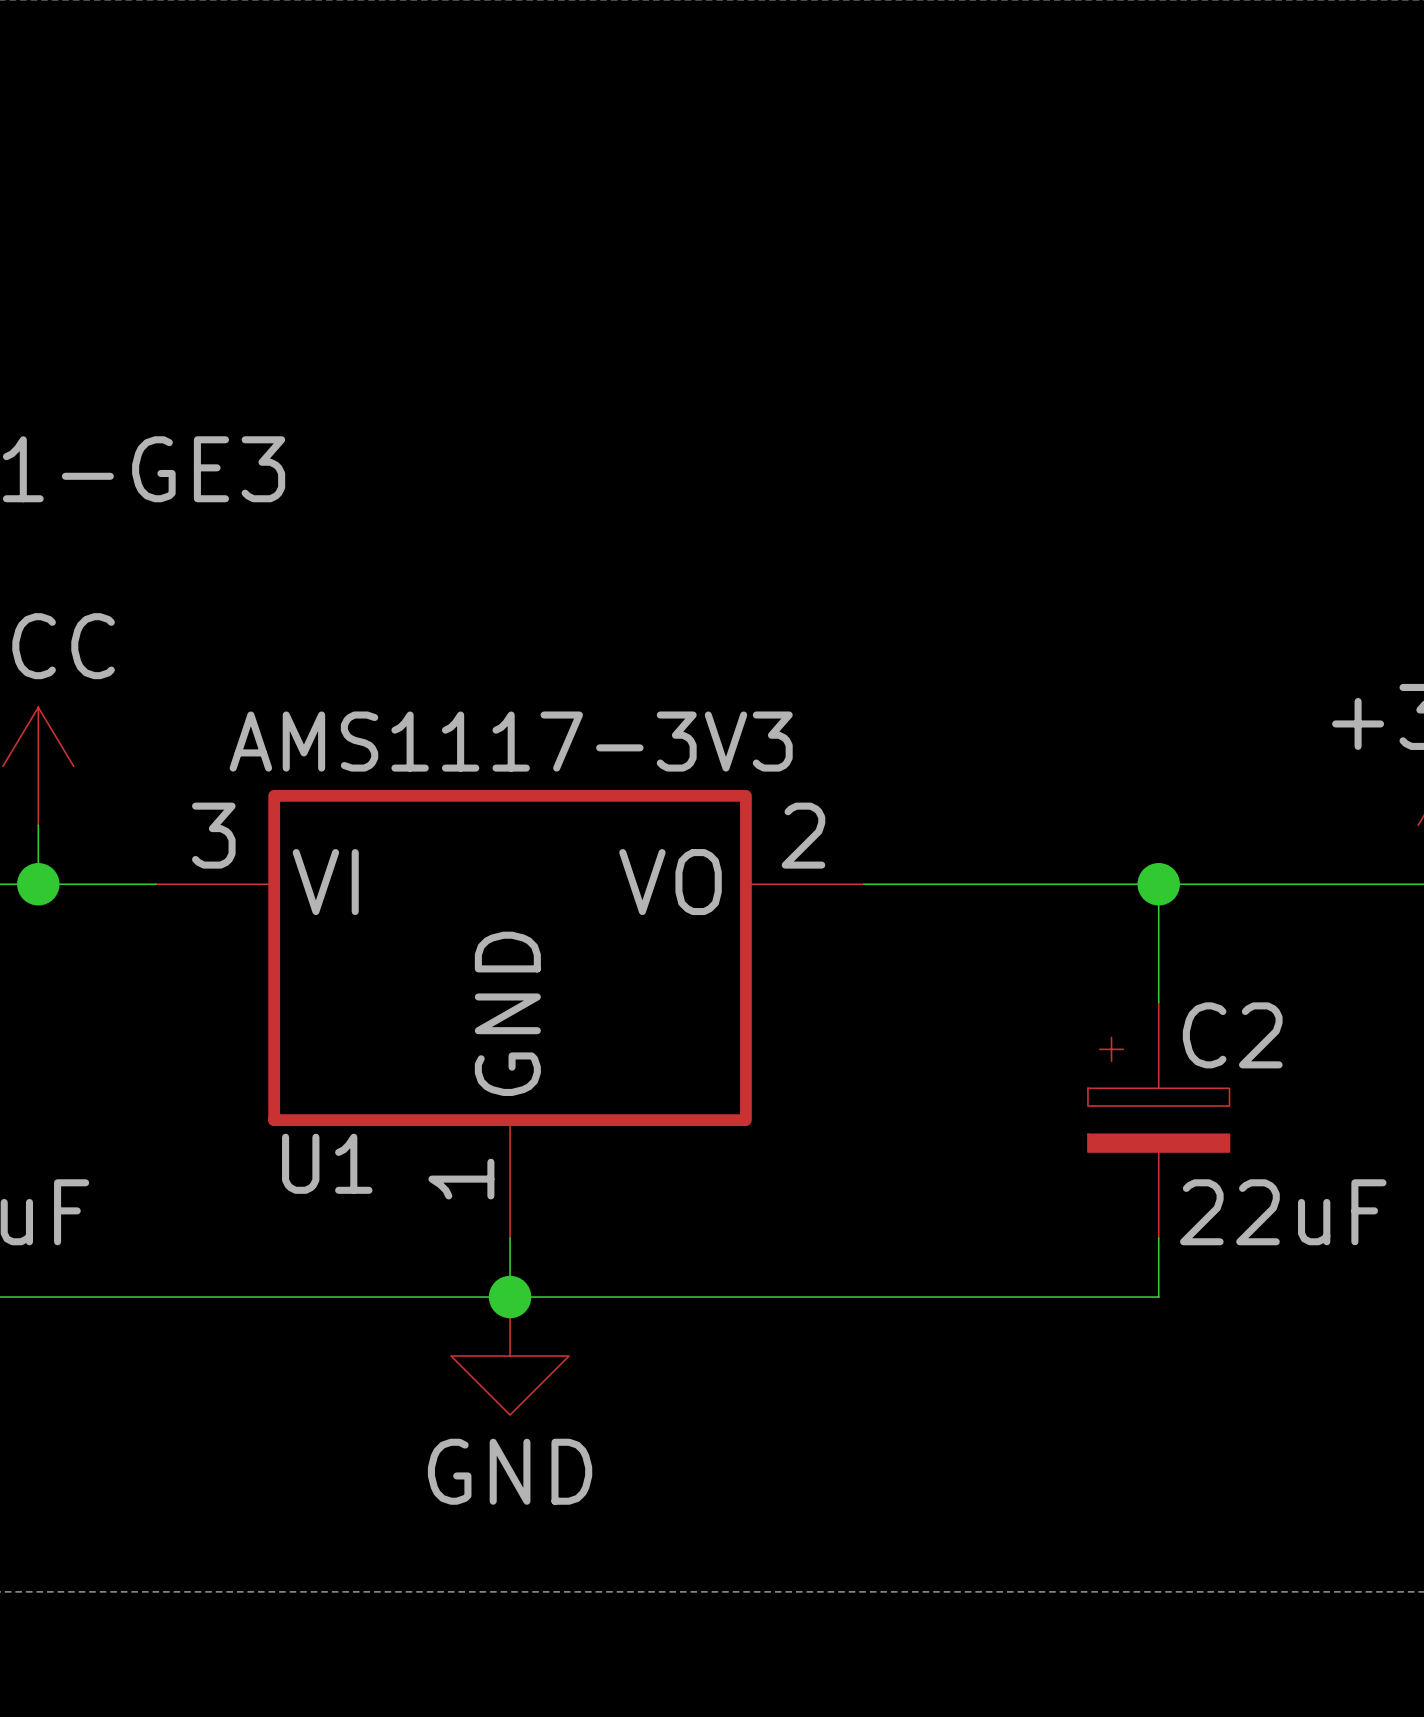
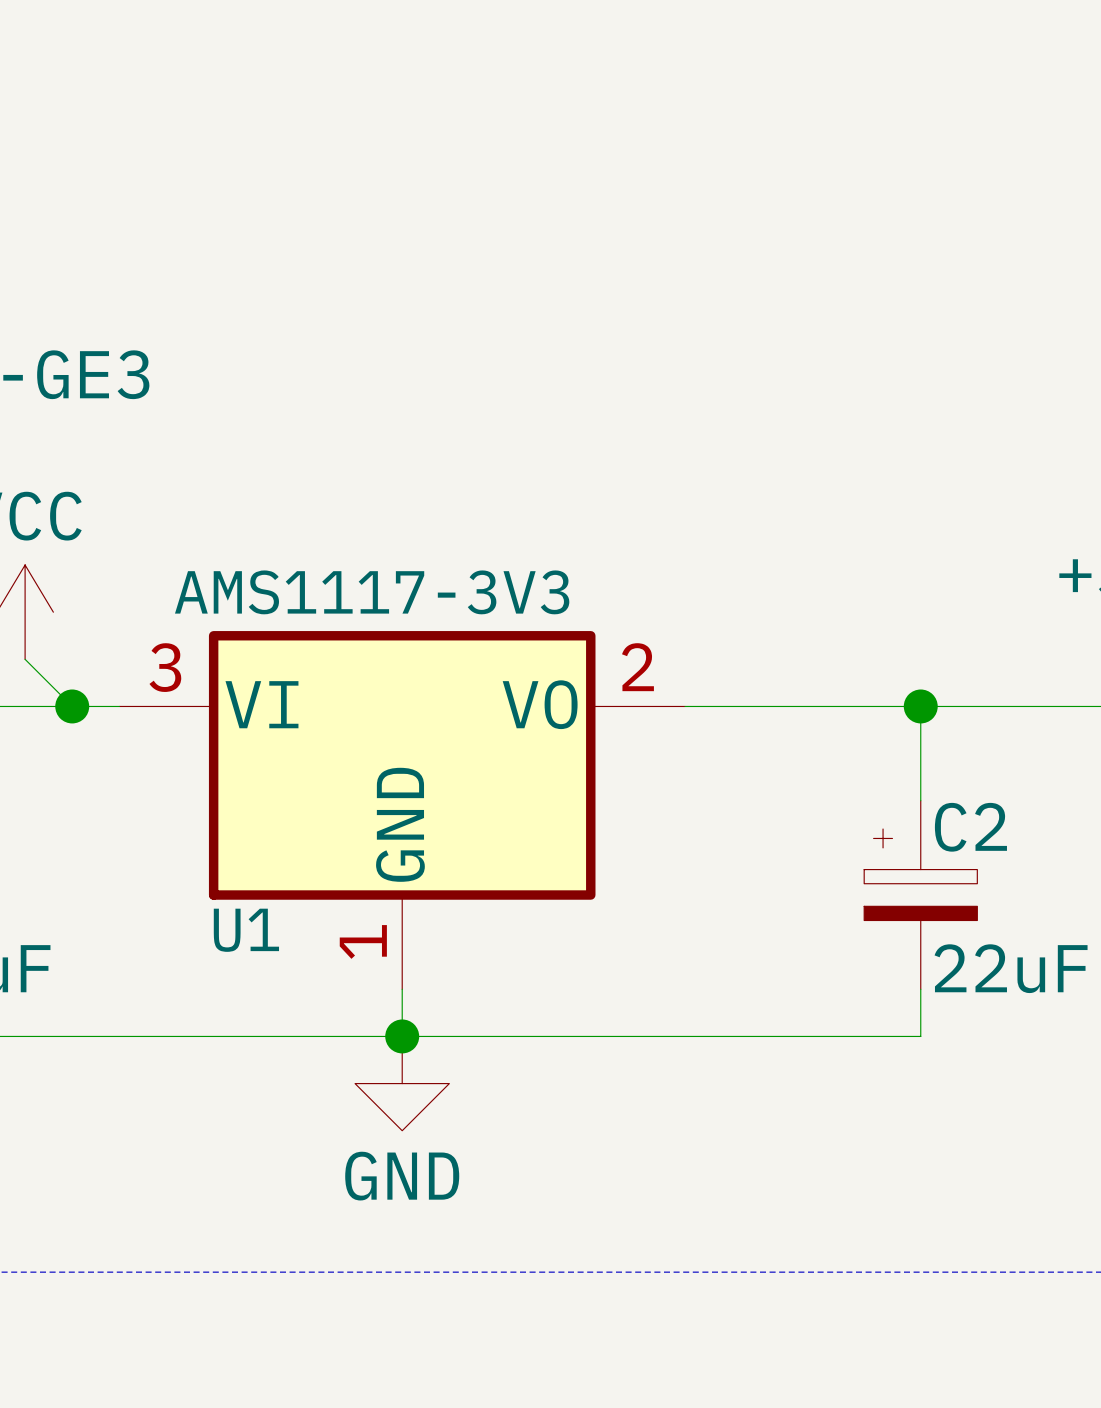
wire: (38, 825) (38, 884) -> (25, 659) (72, 706)
junction position: (38, 884) -> (72, 706)

